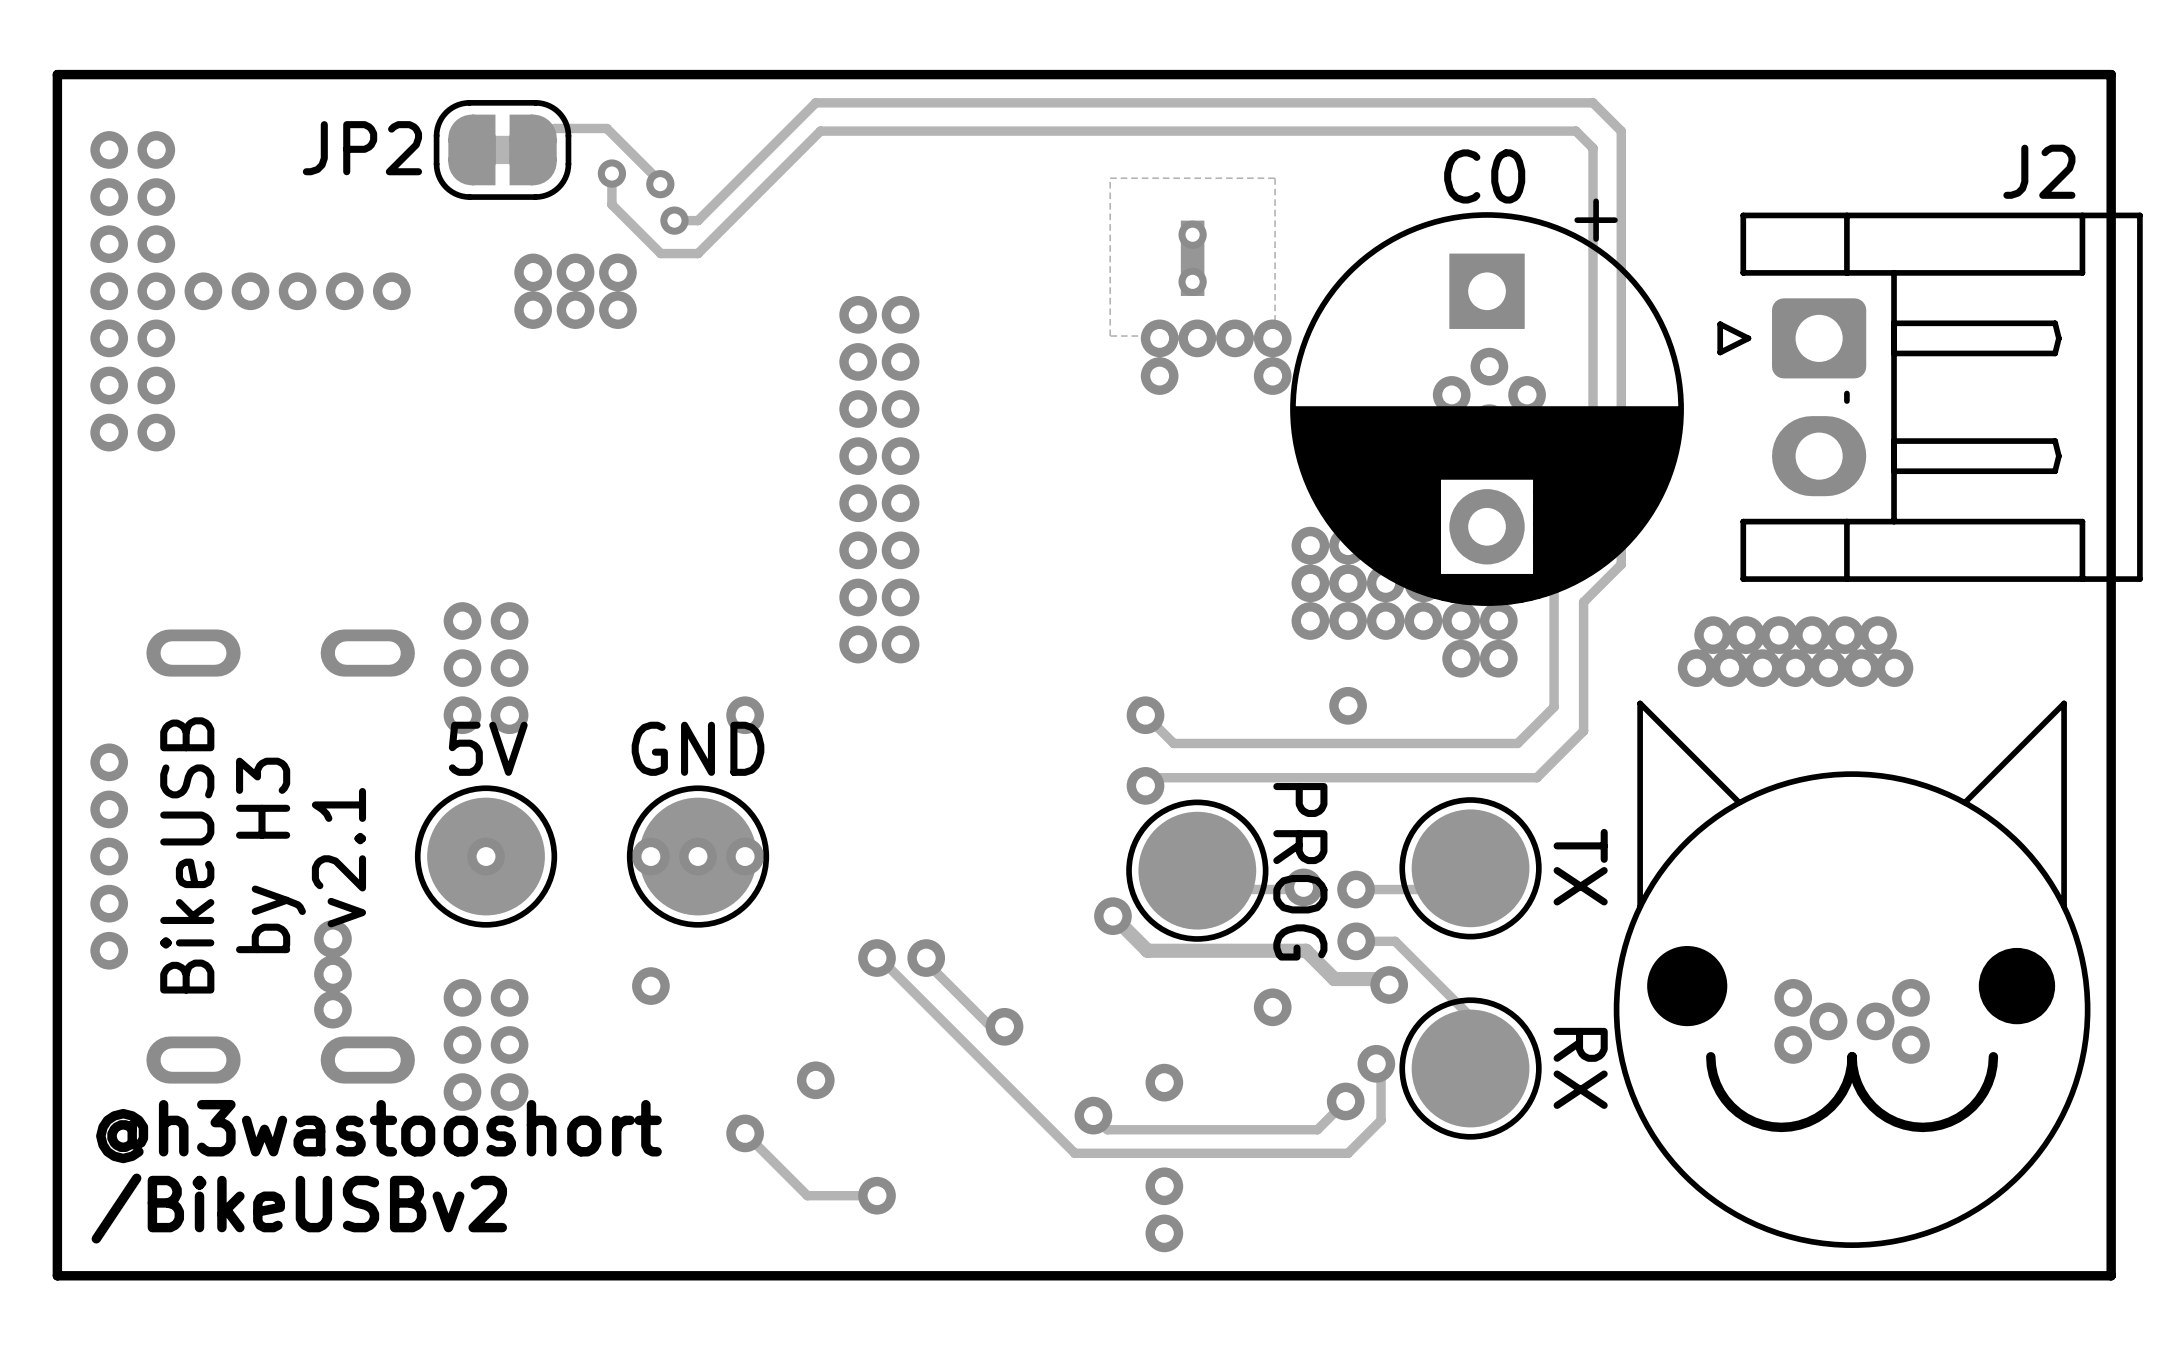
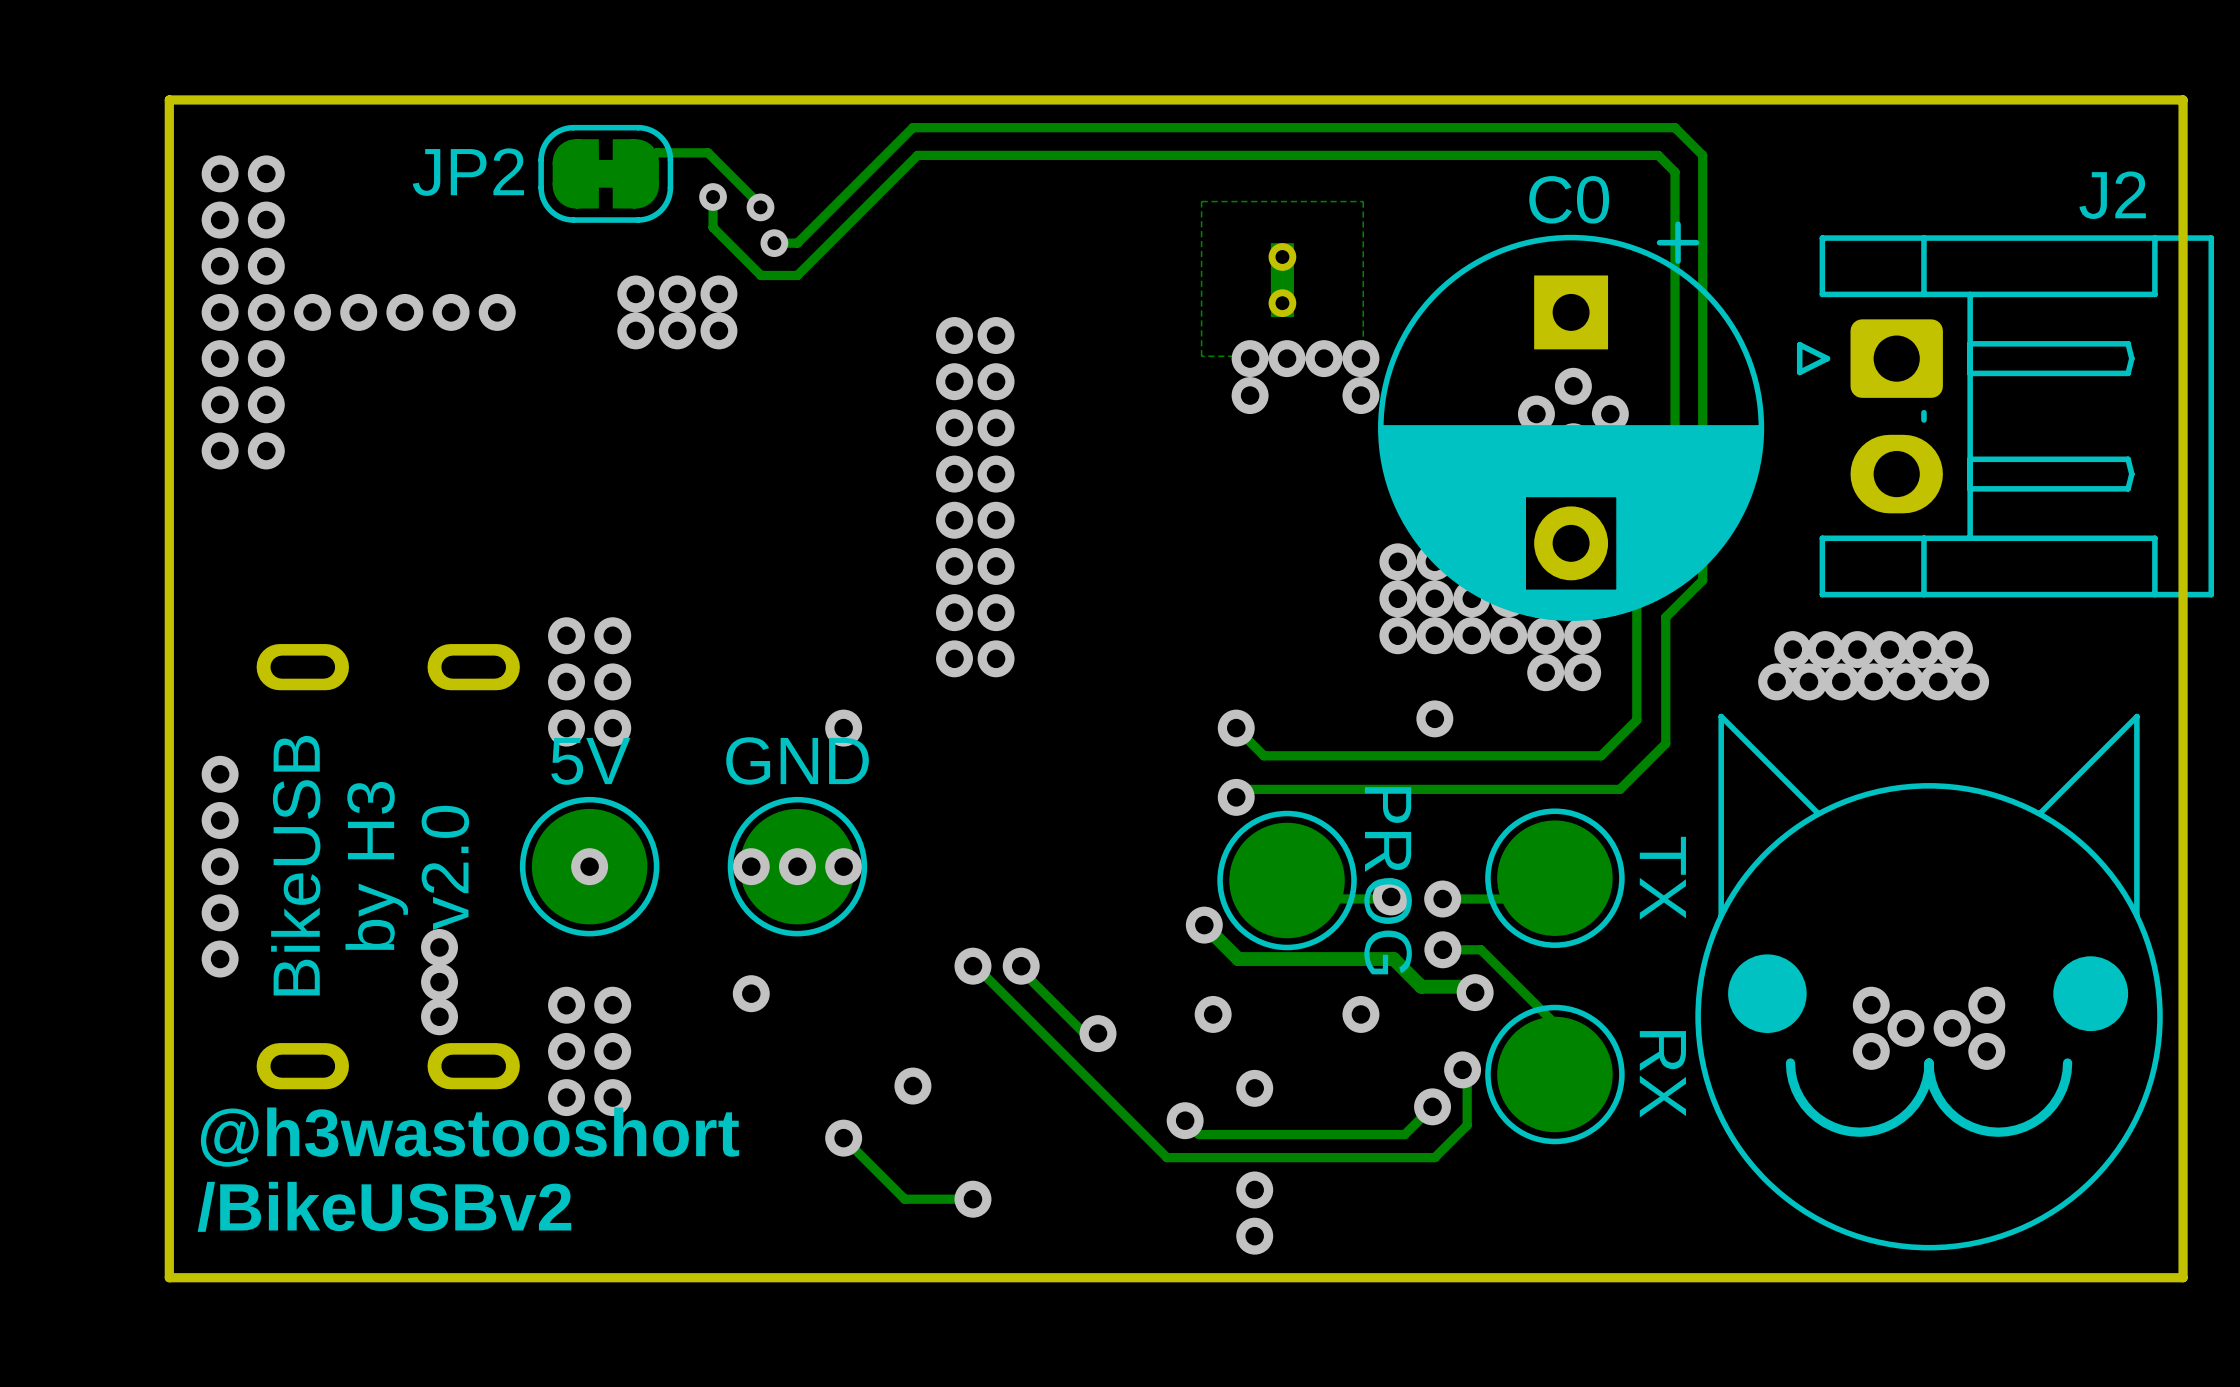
text: v2.1 (338, 857) -> v2.0 (445, 867)
via: none -> (1213, 1014)

